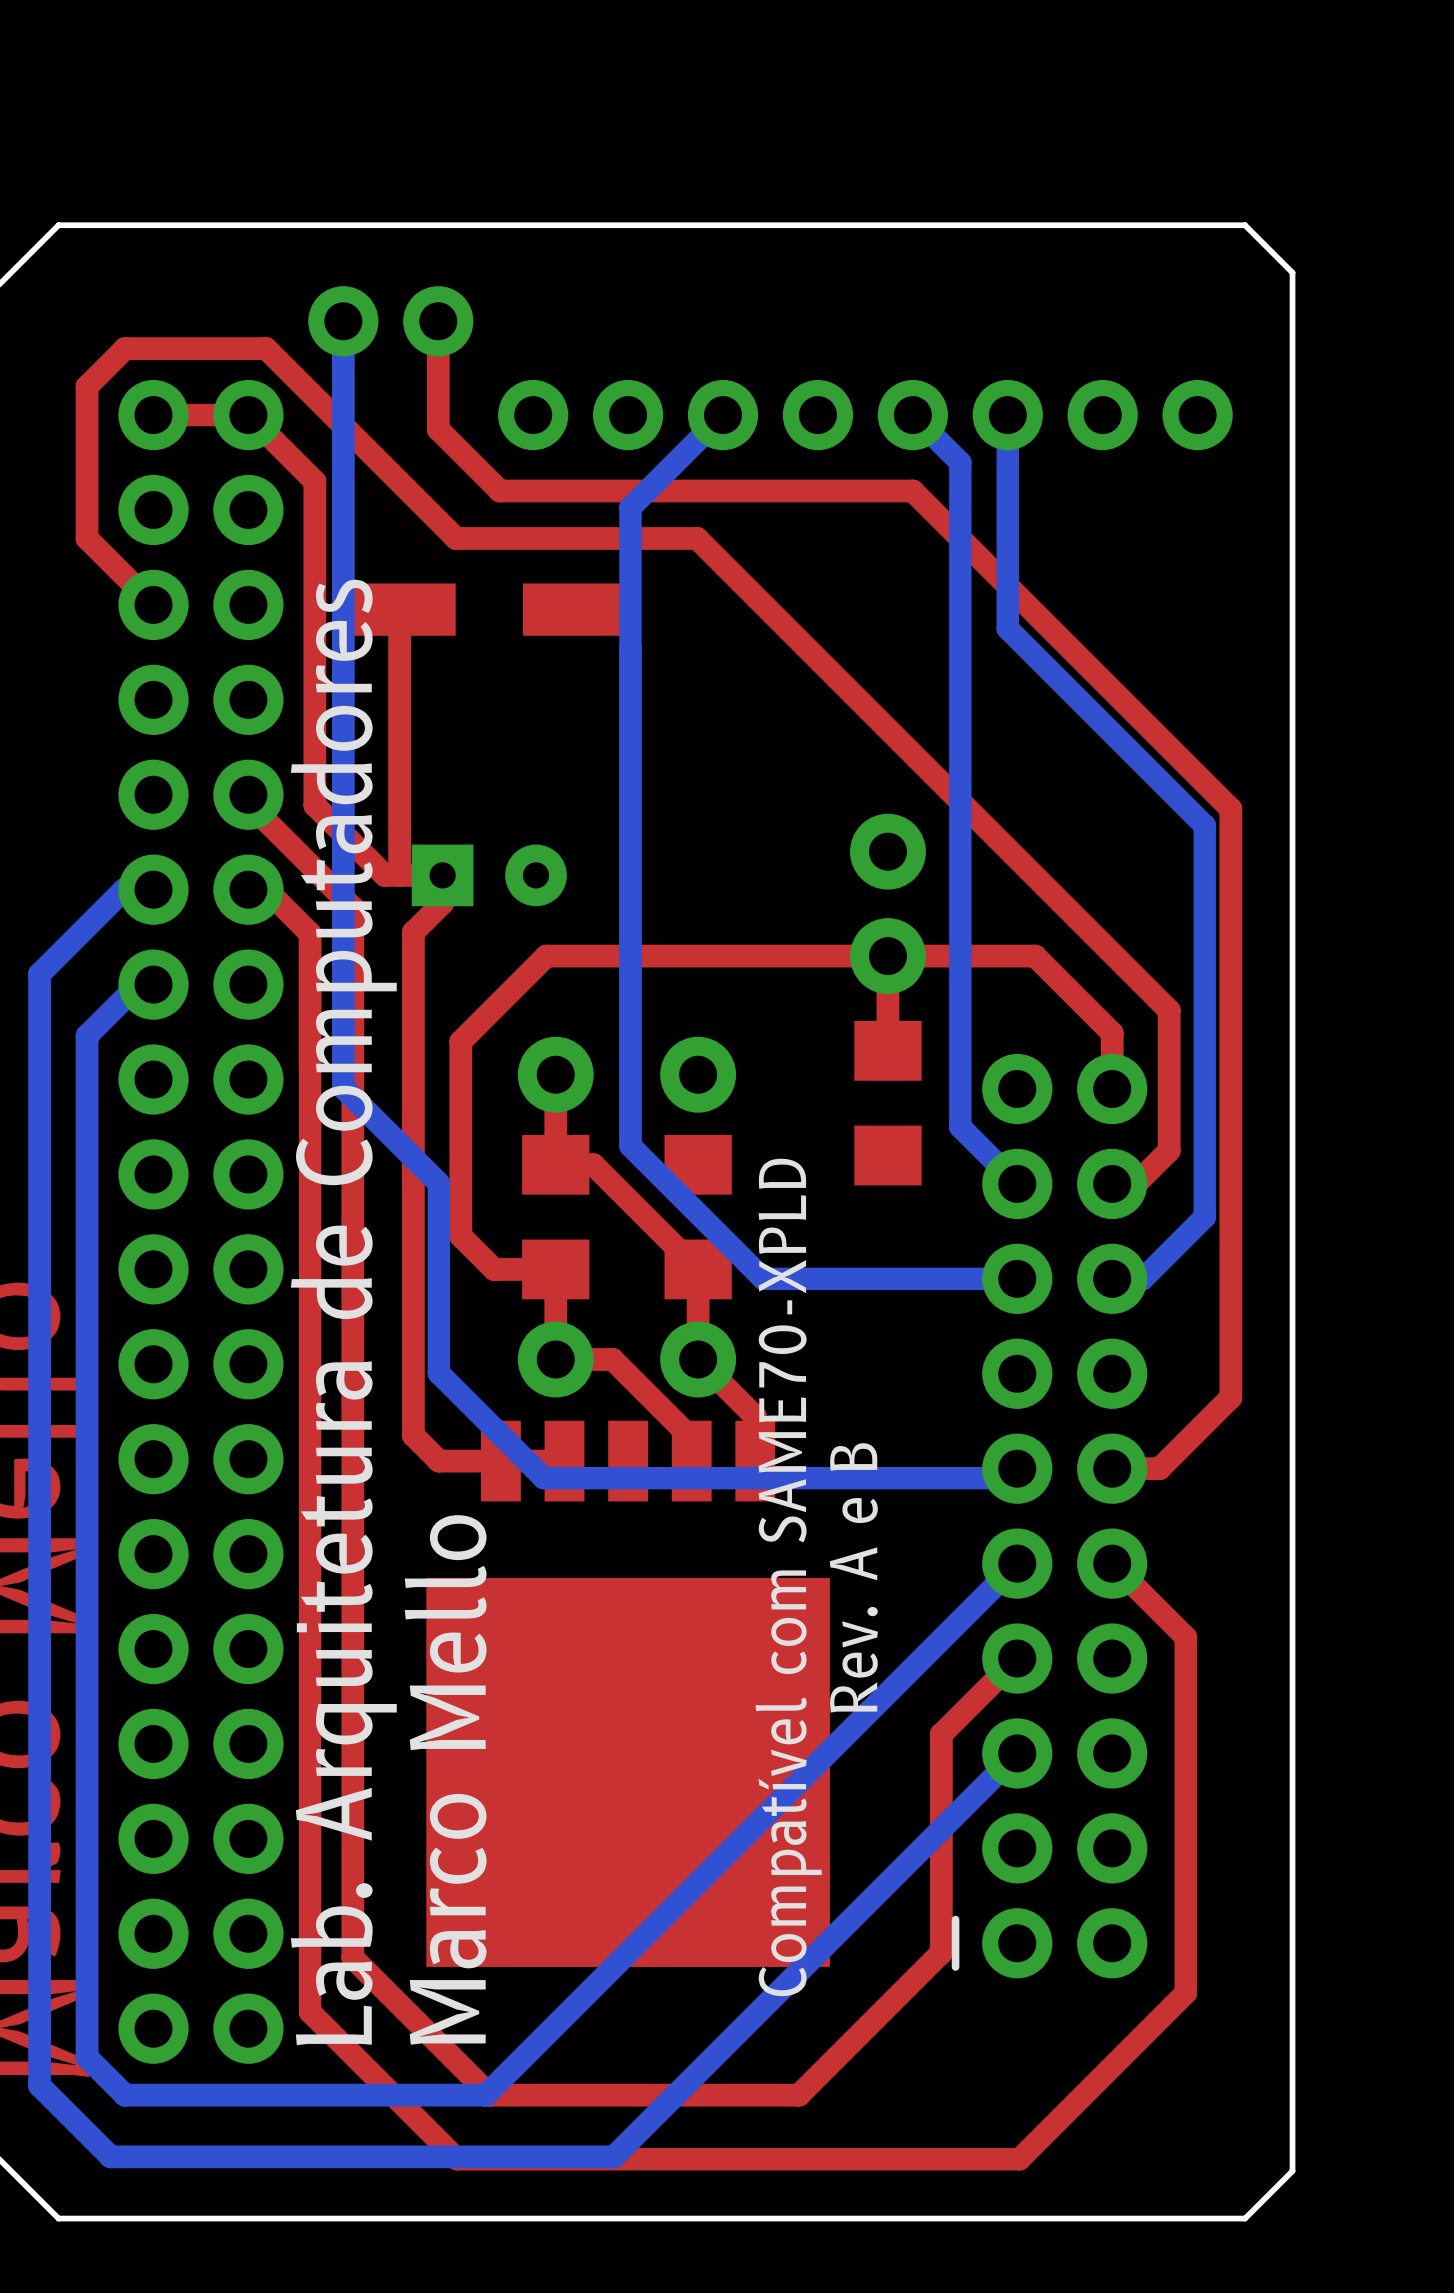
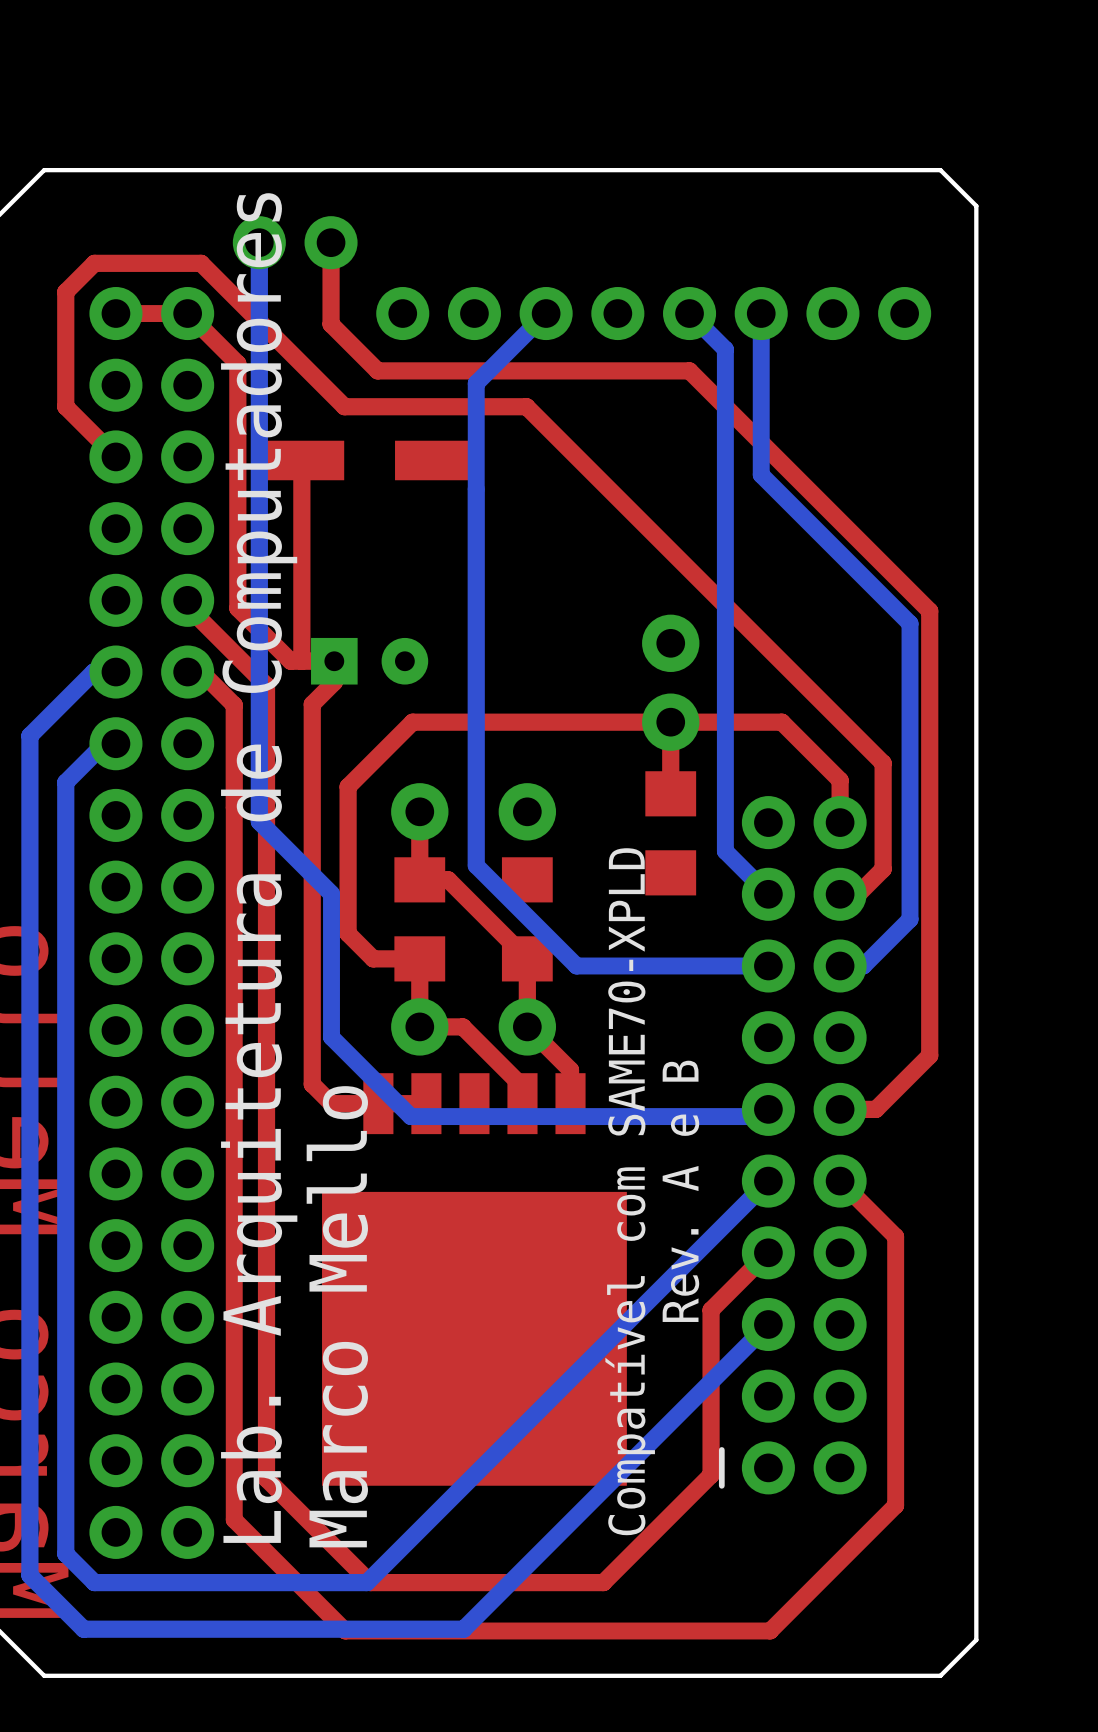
text position: Compatível com SAME70-XPLD (788, 1577) -> Compatível com SAME70-XPLD (630, 1191)
text position: Rev. A e B (853, 1577) -> Rev. A e B (680, 1191)

